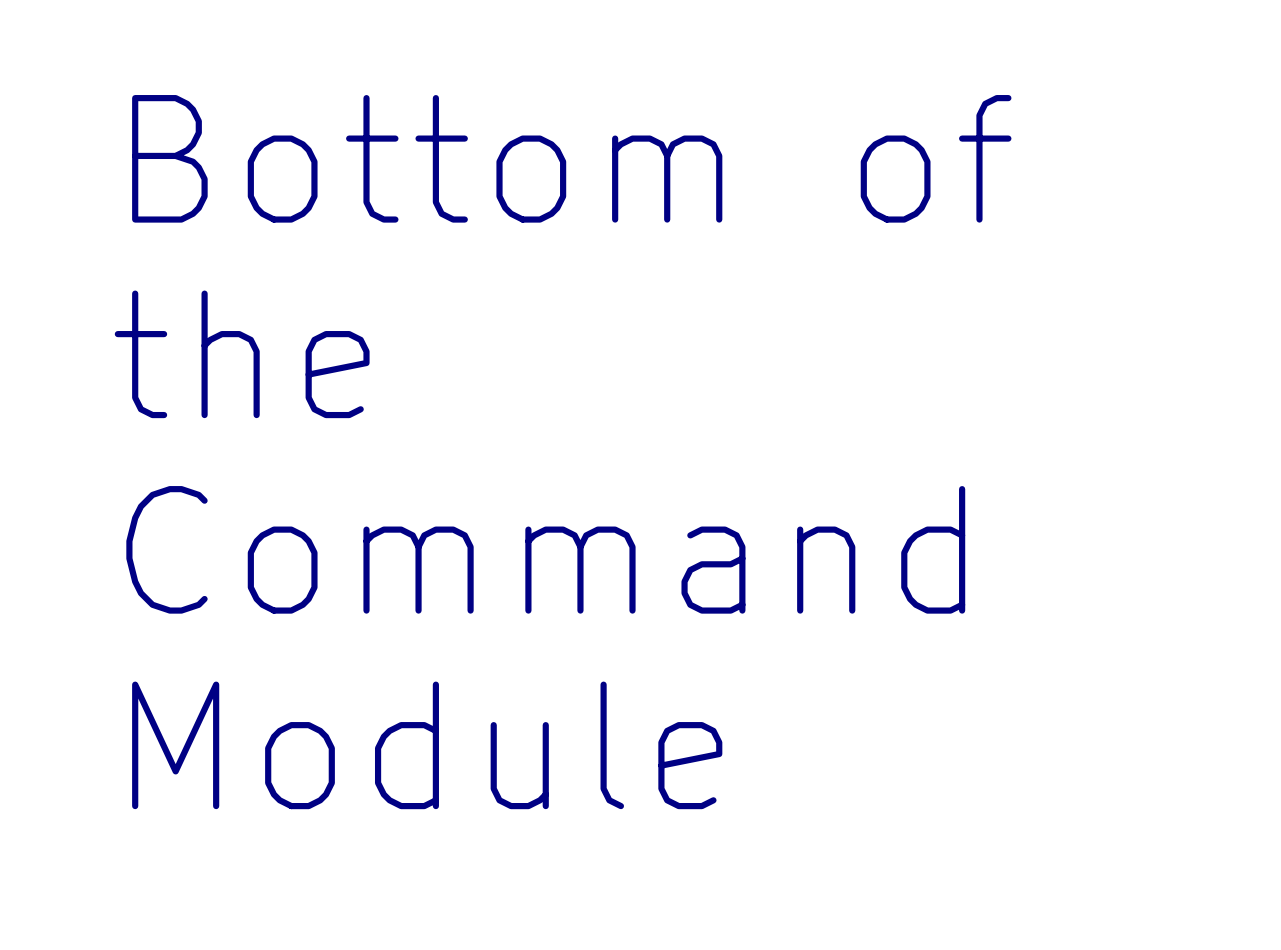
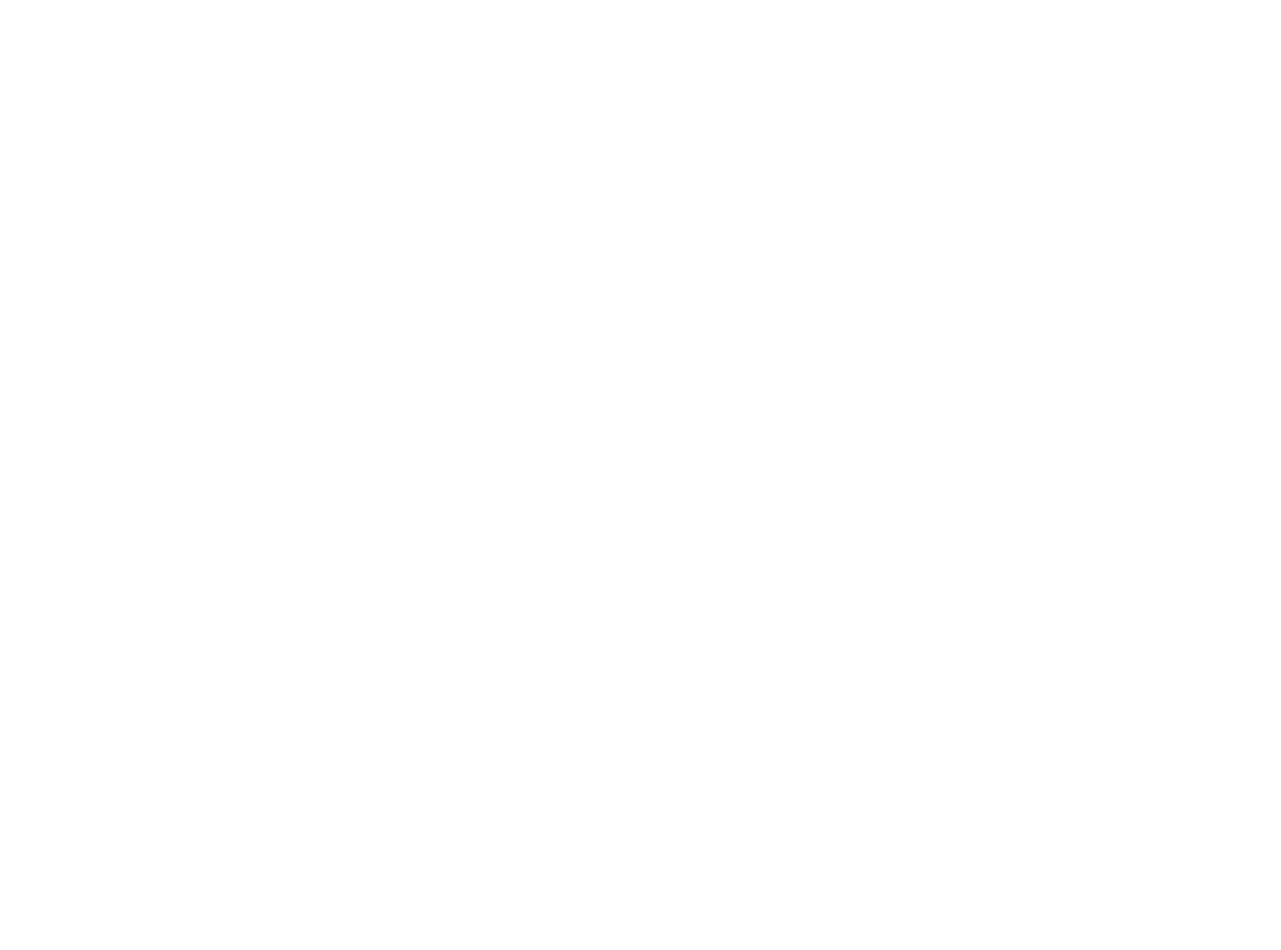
text: Bottom of (571, 158) -> none
text: the (242, 354) -> none
text: Command (545, 549) -> none
text: Module (427, 745) -> none

